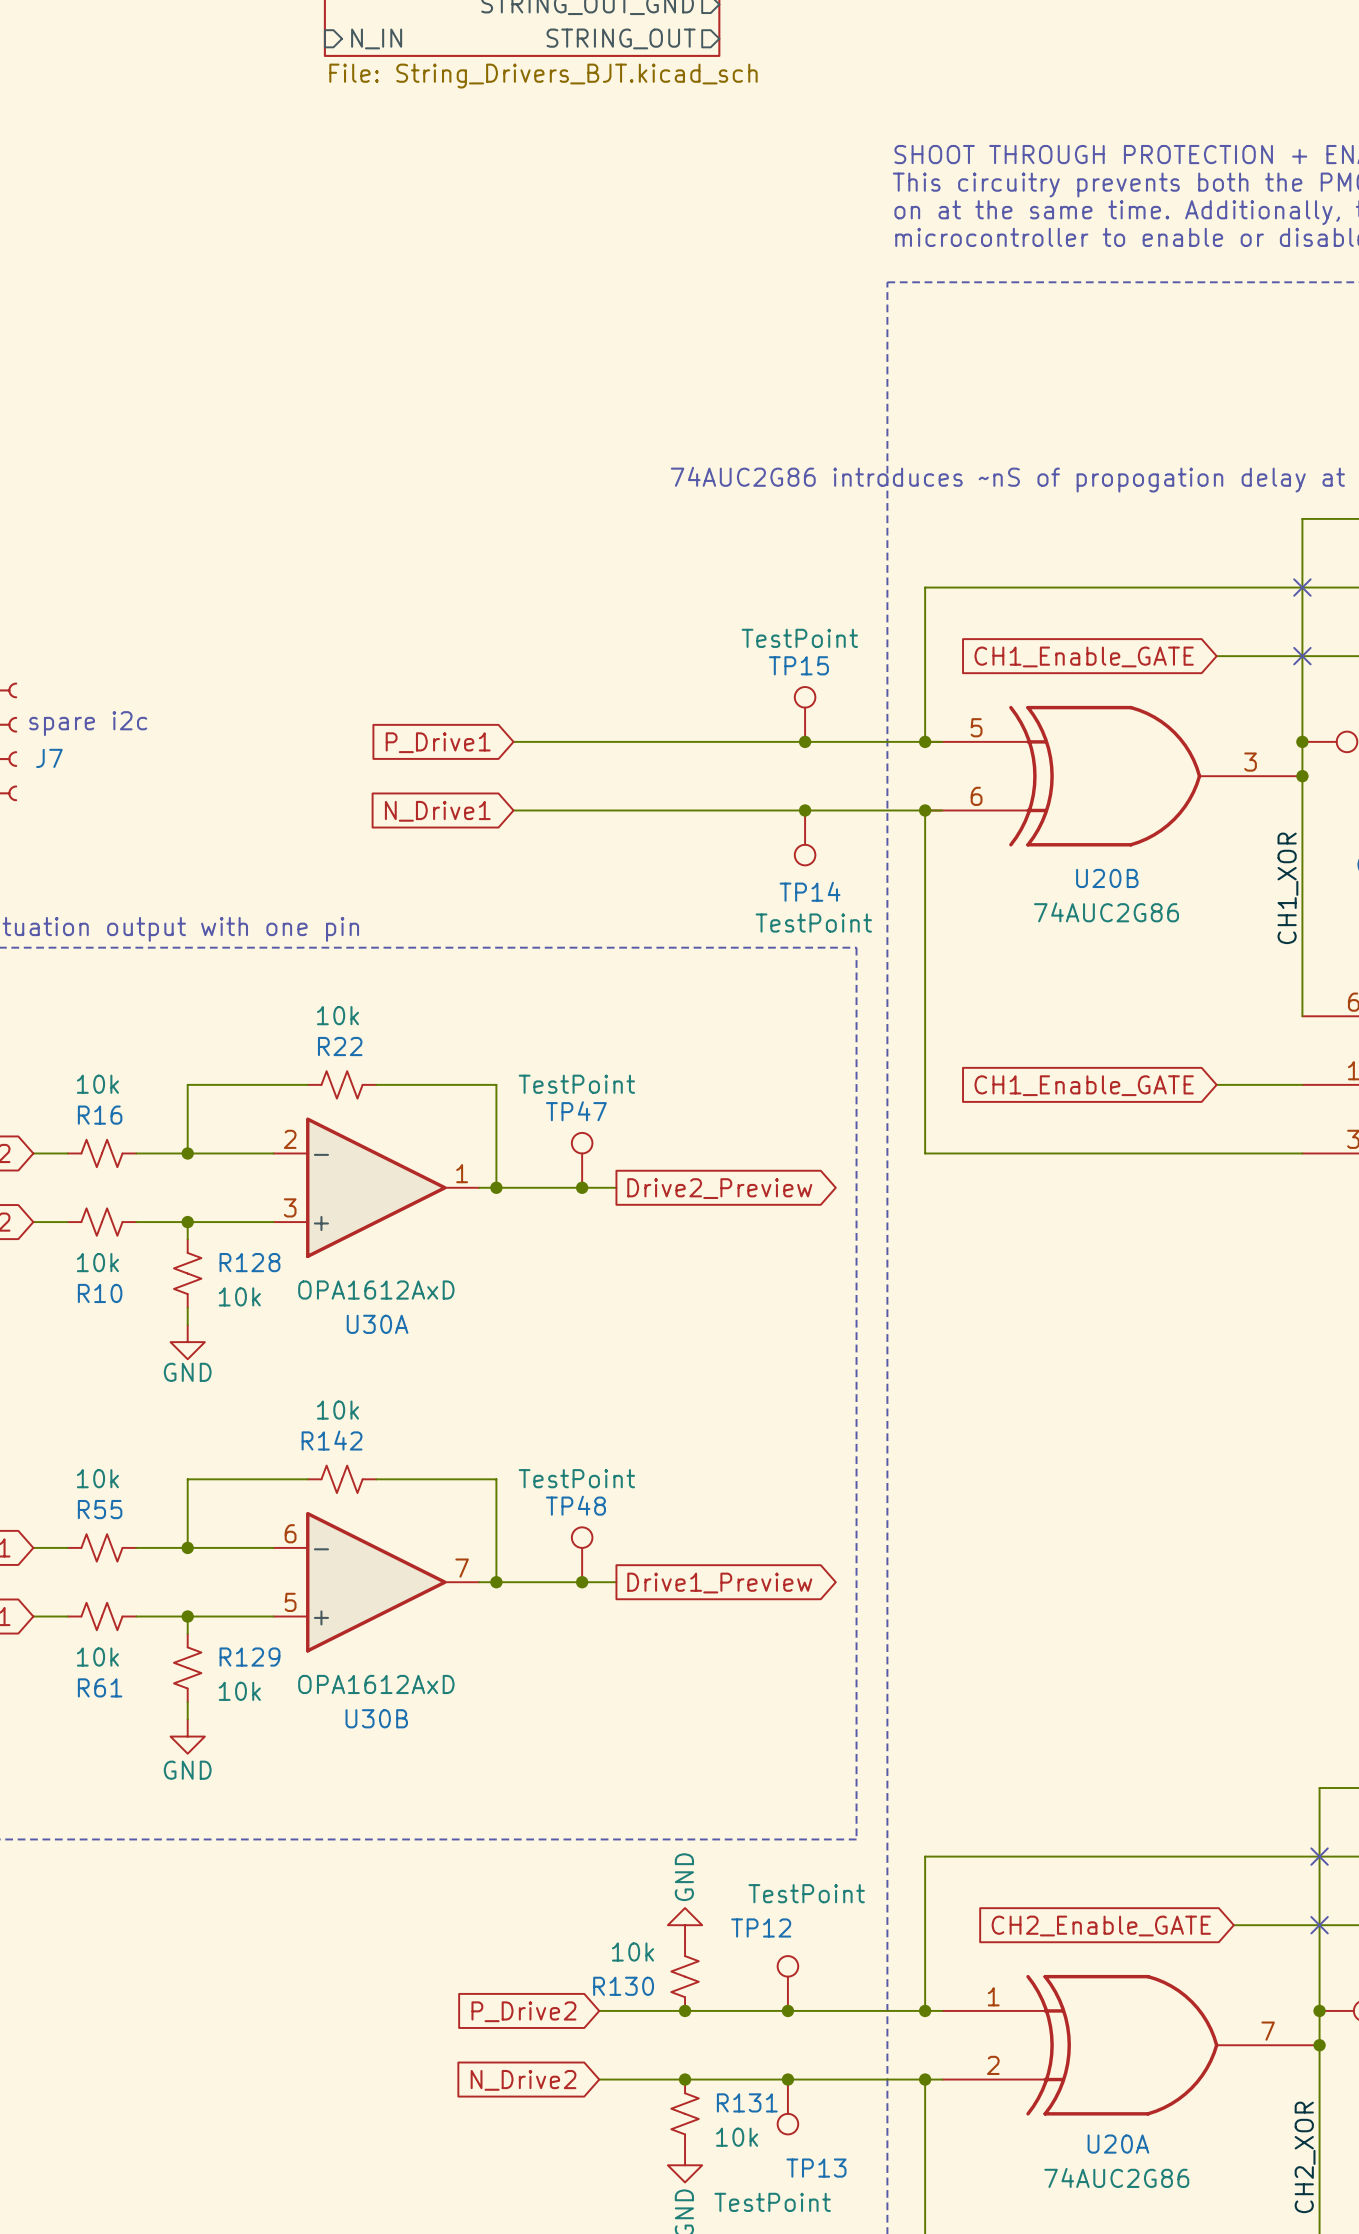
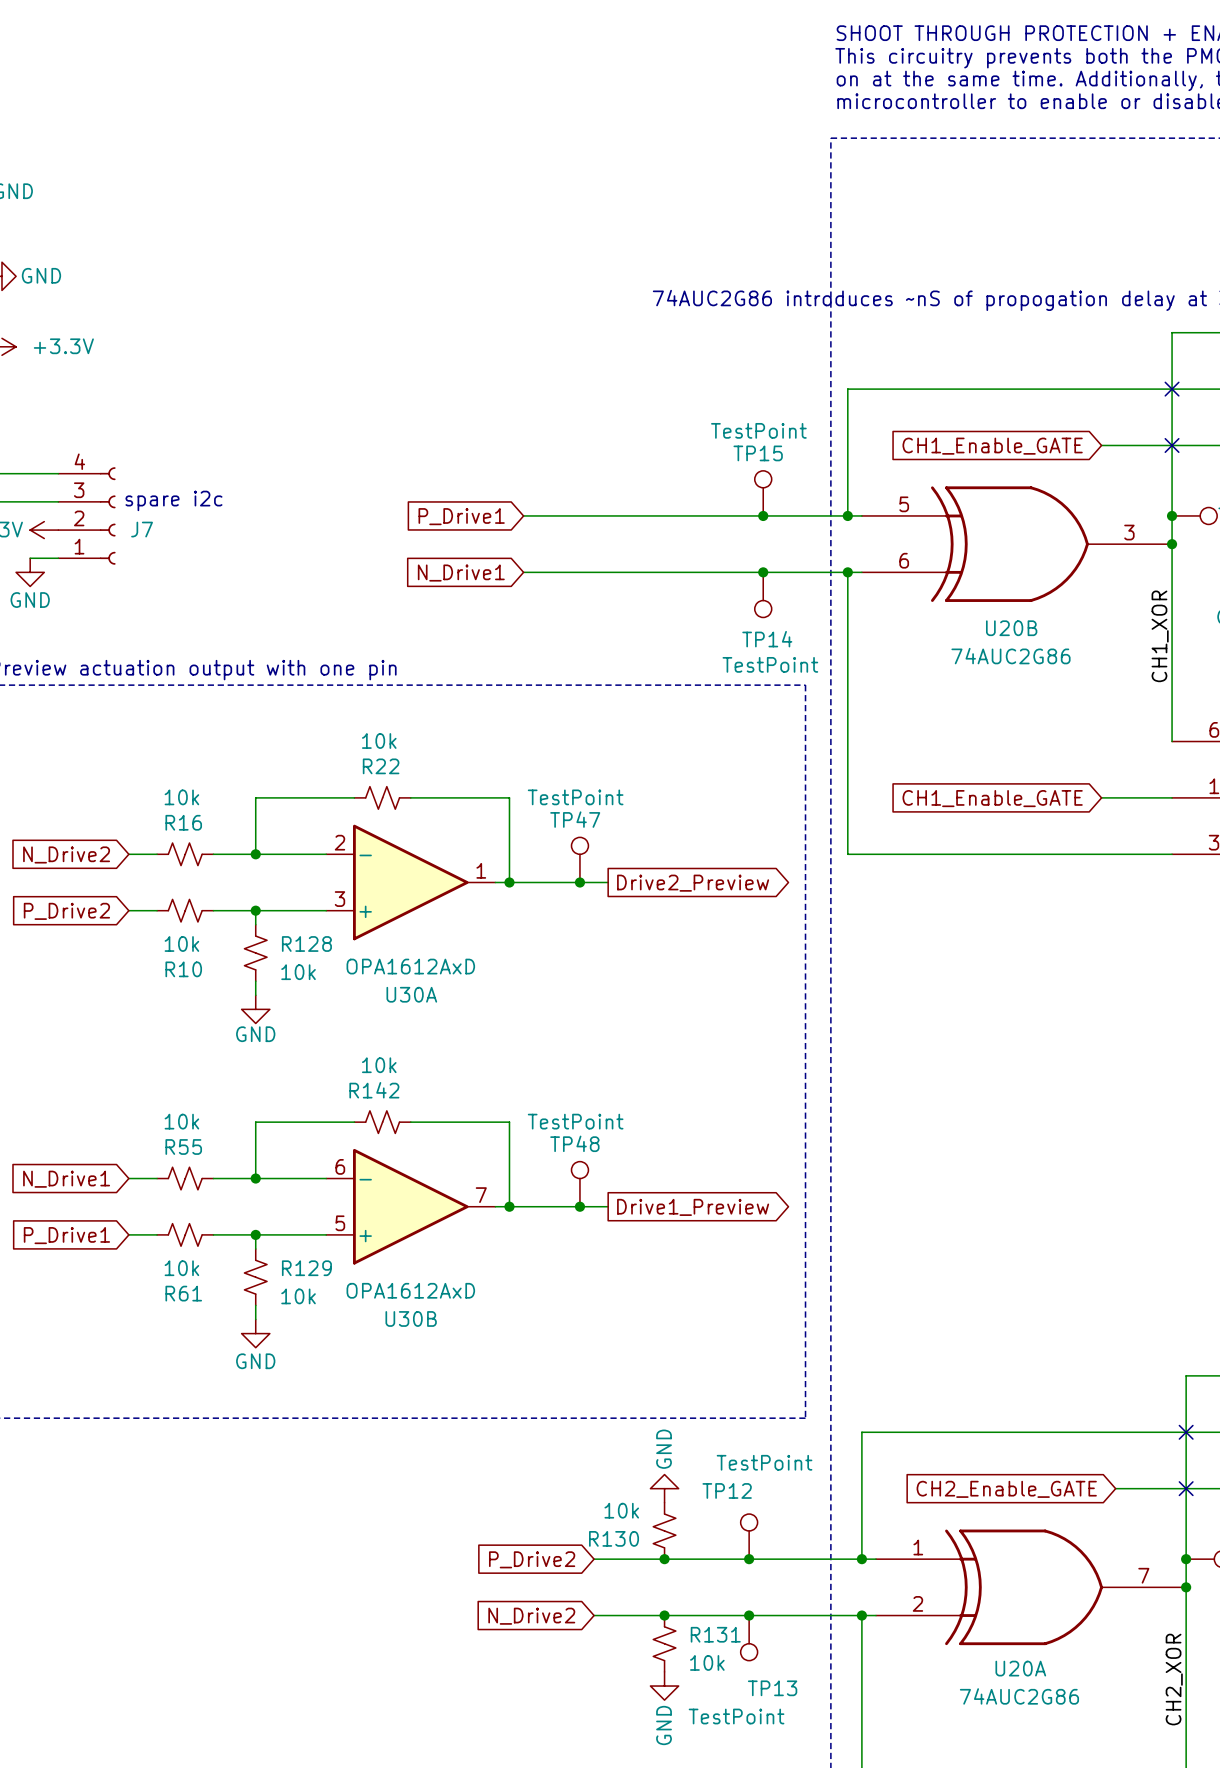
wire: (925, 587) (925, 741) (942, 741) -> (861, 389) (847, 389) (847, 515)
junction position: (925, 741) -> (847, 515)
junction position: (925, 810) -> (847, 572)
wire: (942, 810) (925, 810) (925, 1153) -> (847, 572) (847, 854) (861, 854)

